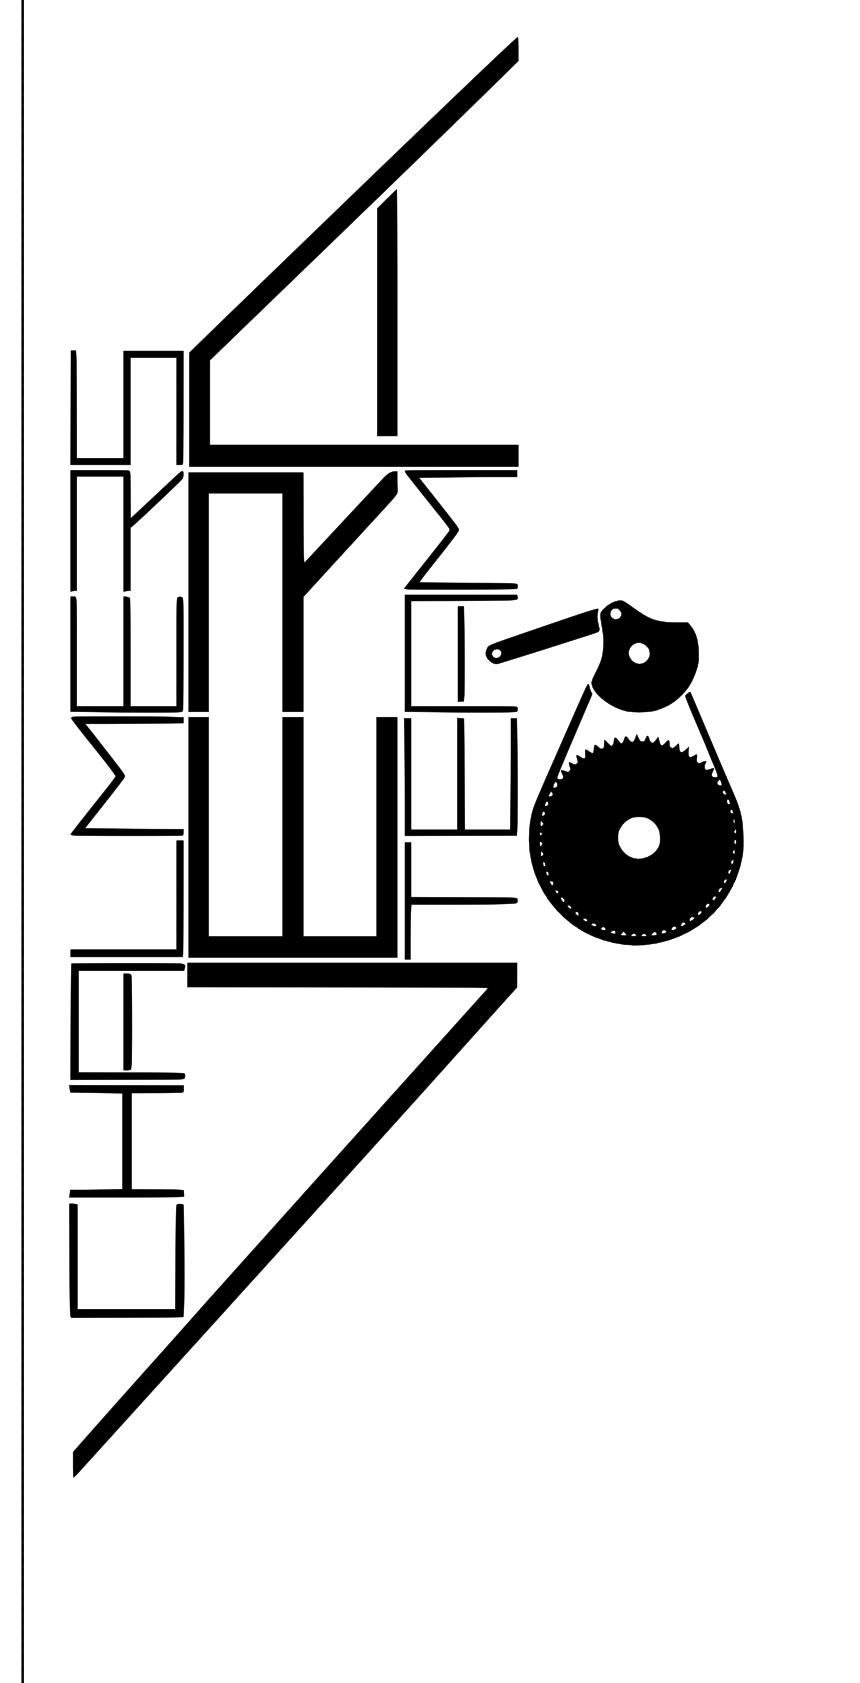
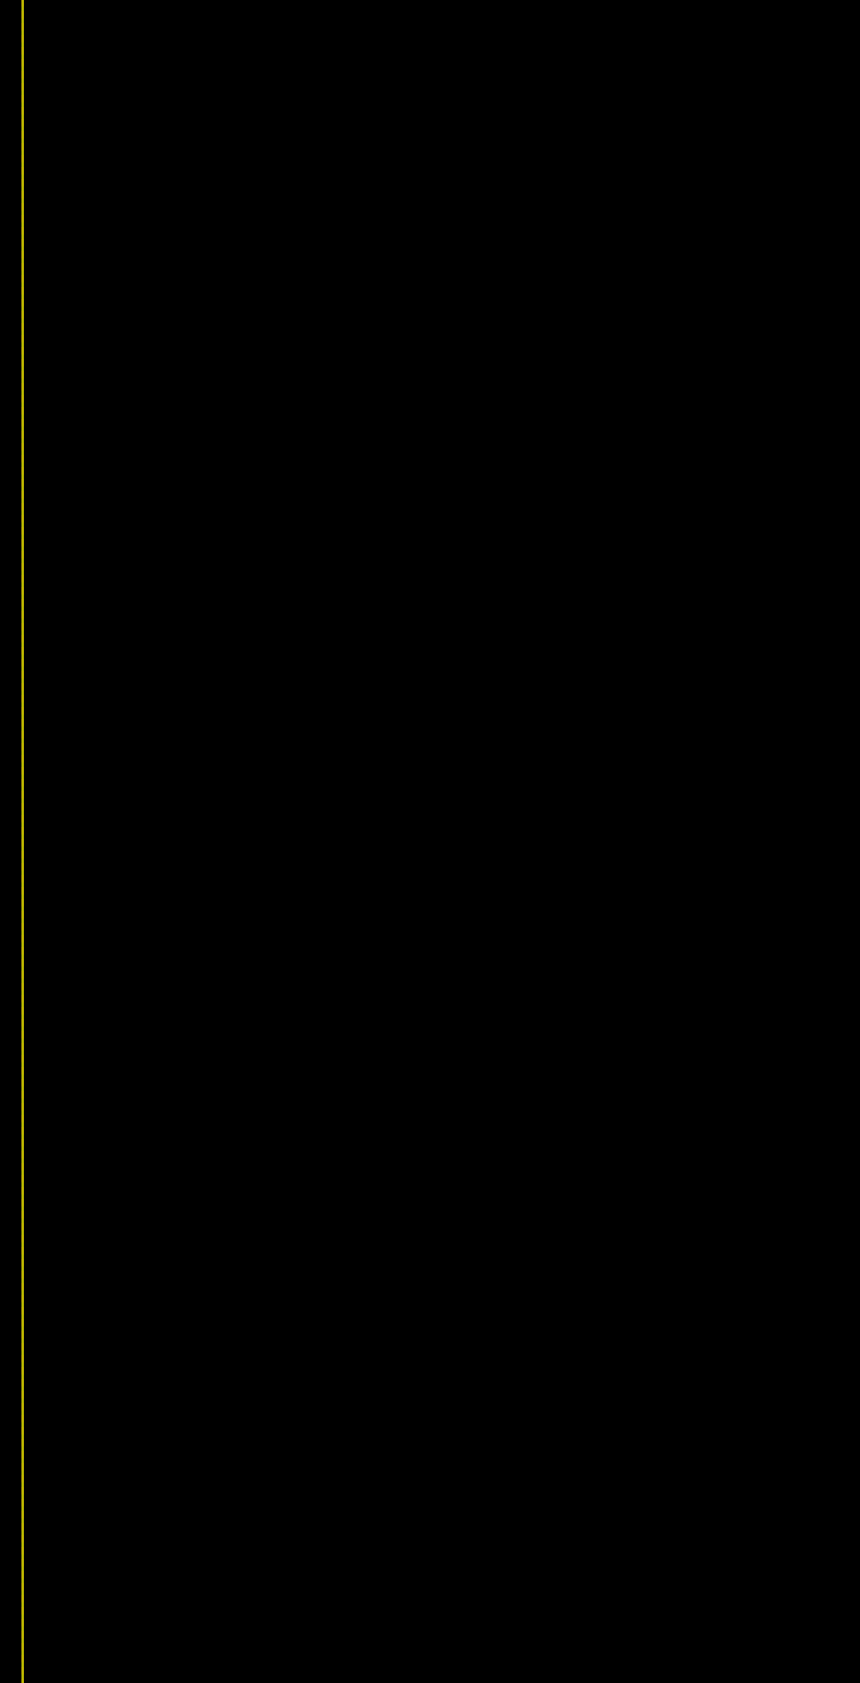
drawing: [69, 37, 744, 1478] -> none

